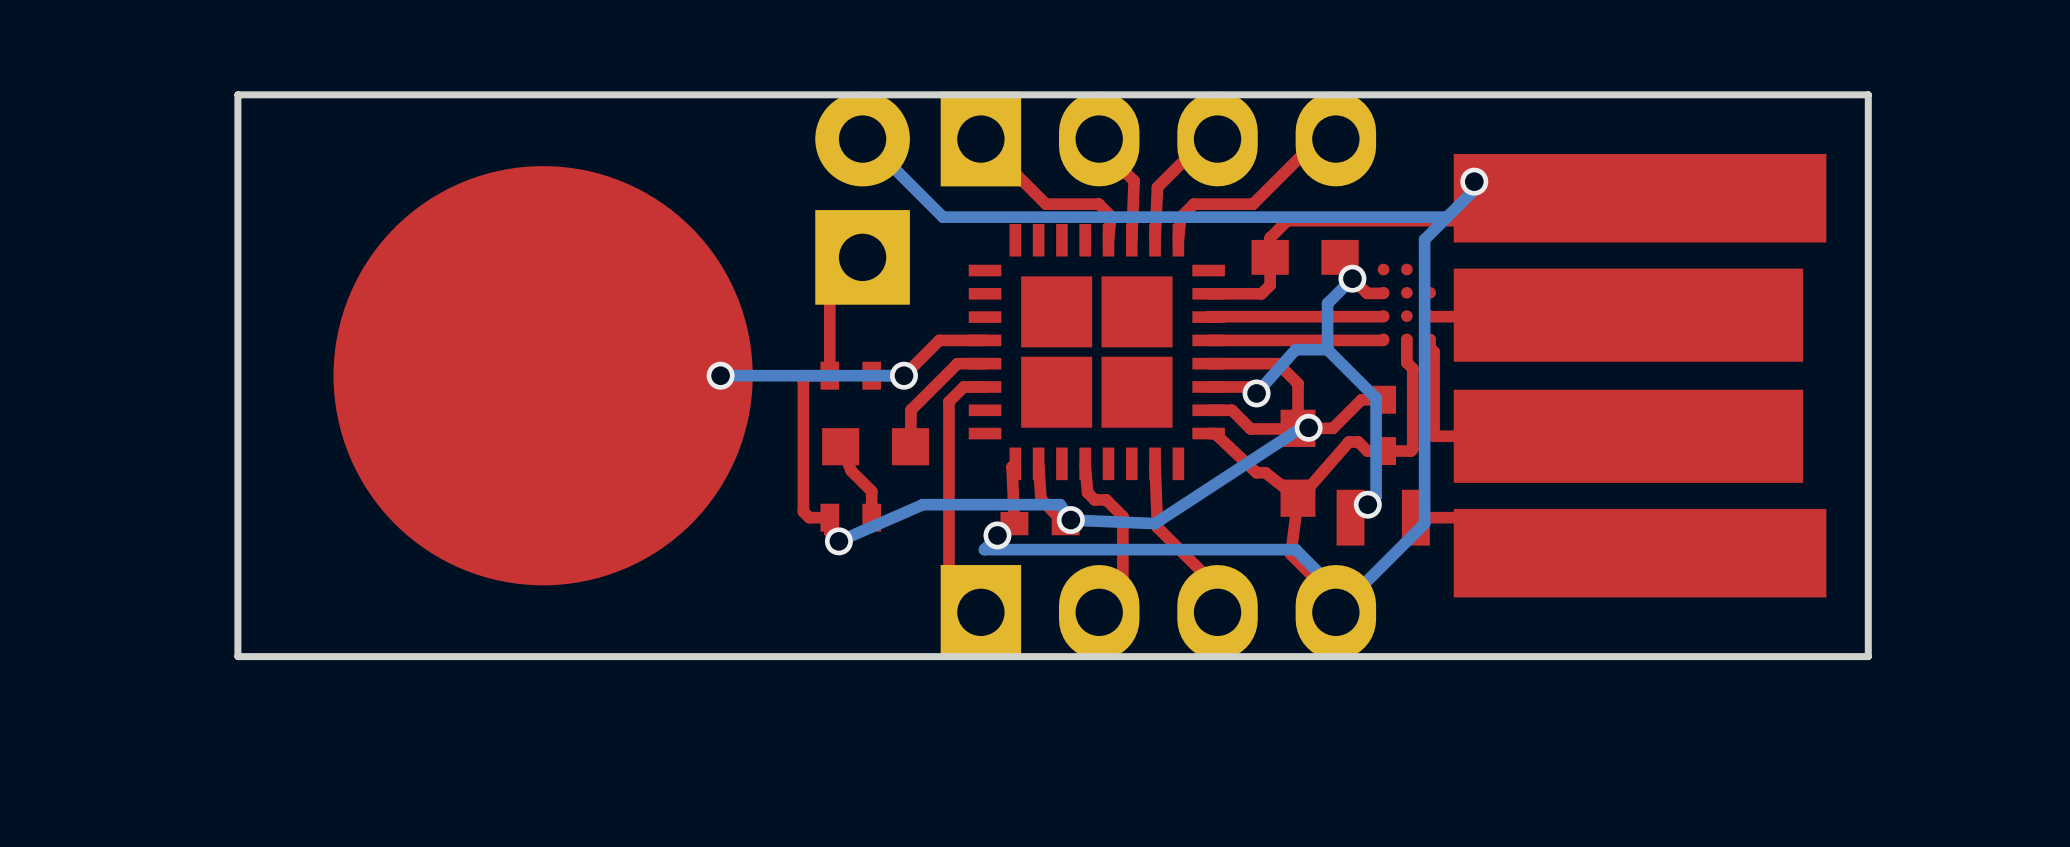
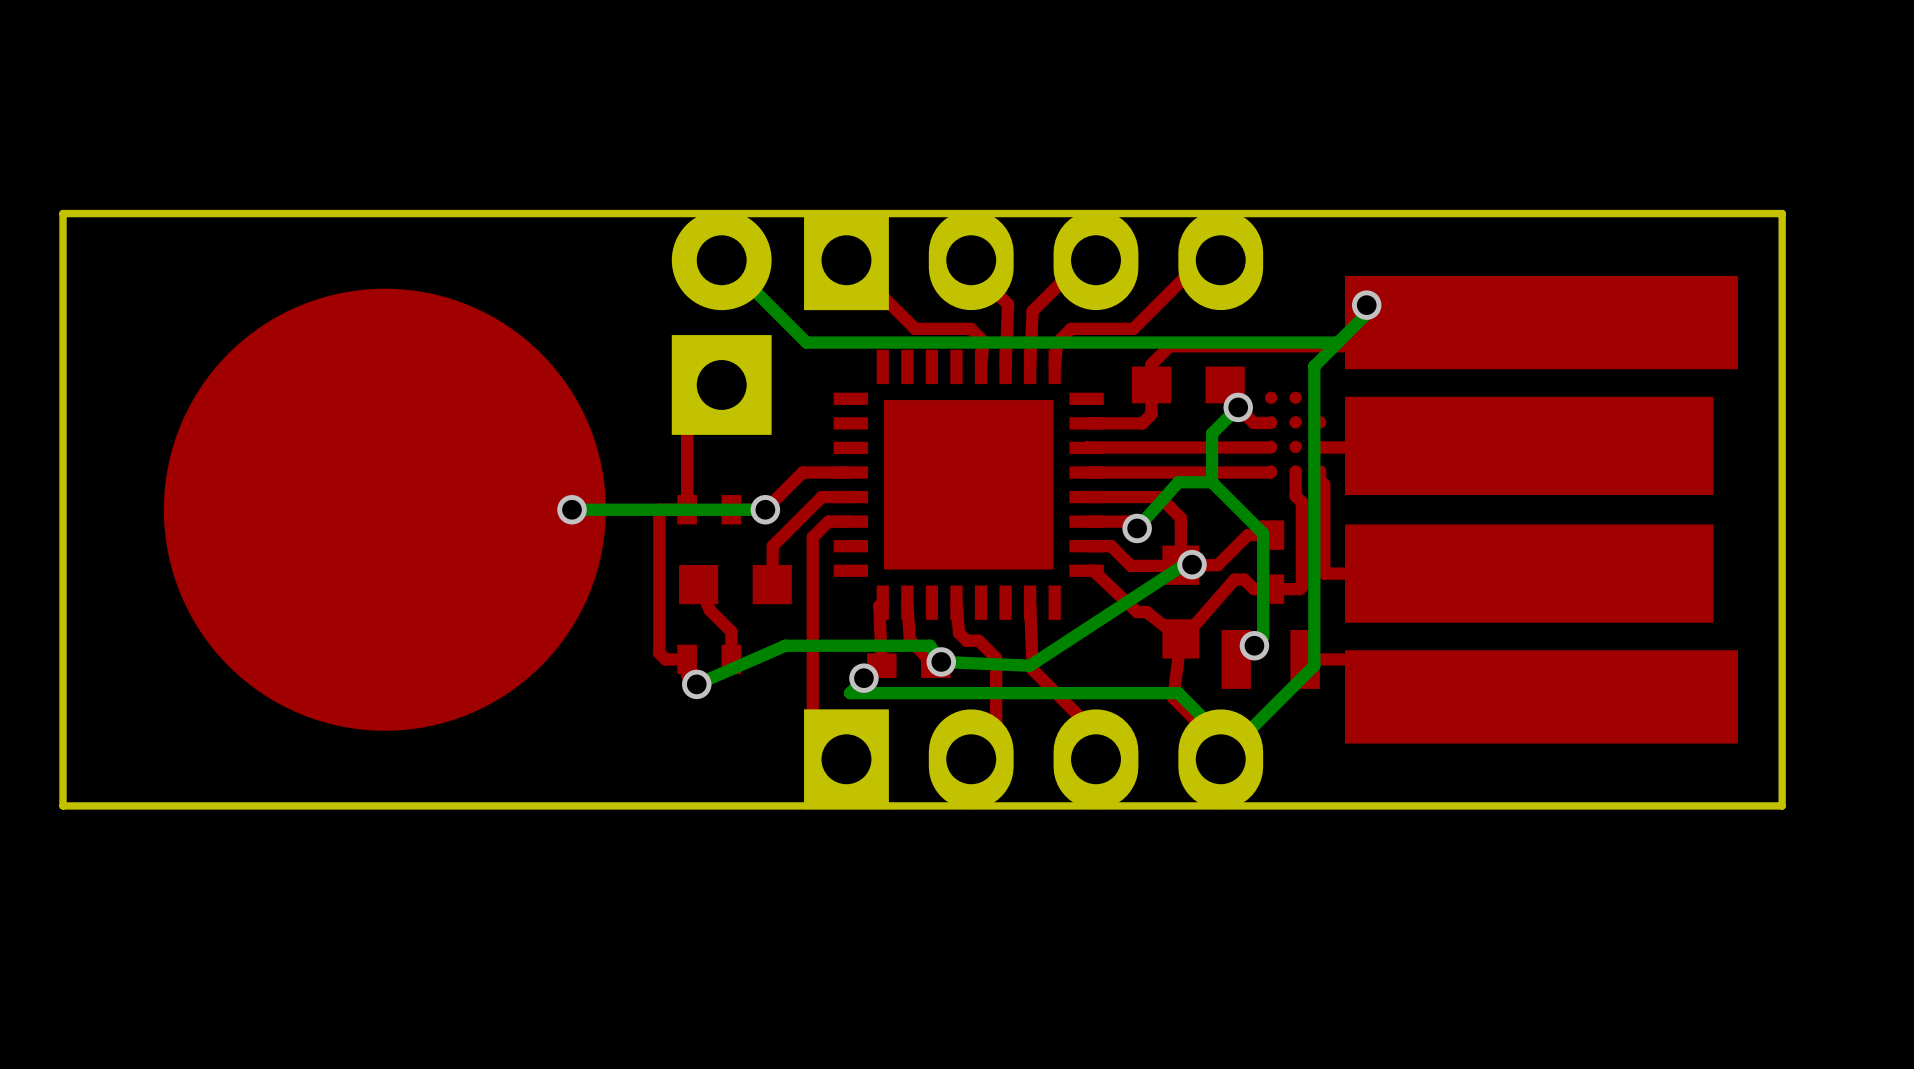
part footprint: [968, 223, 1225, 481] -> [833, 349, 1104, 620]

